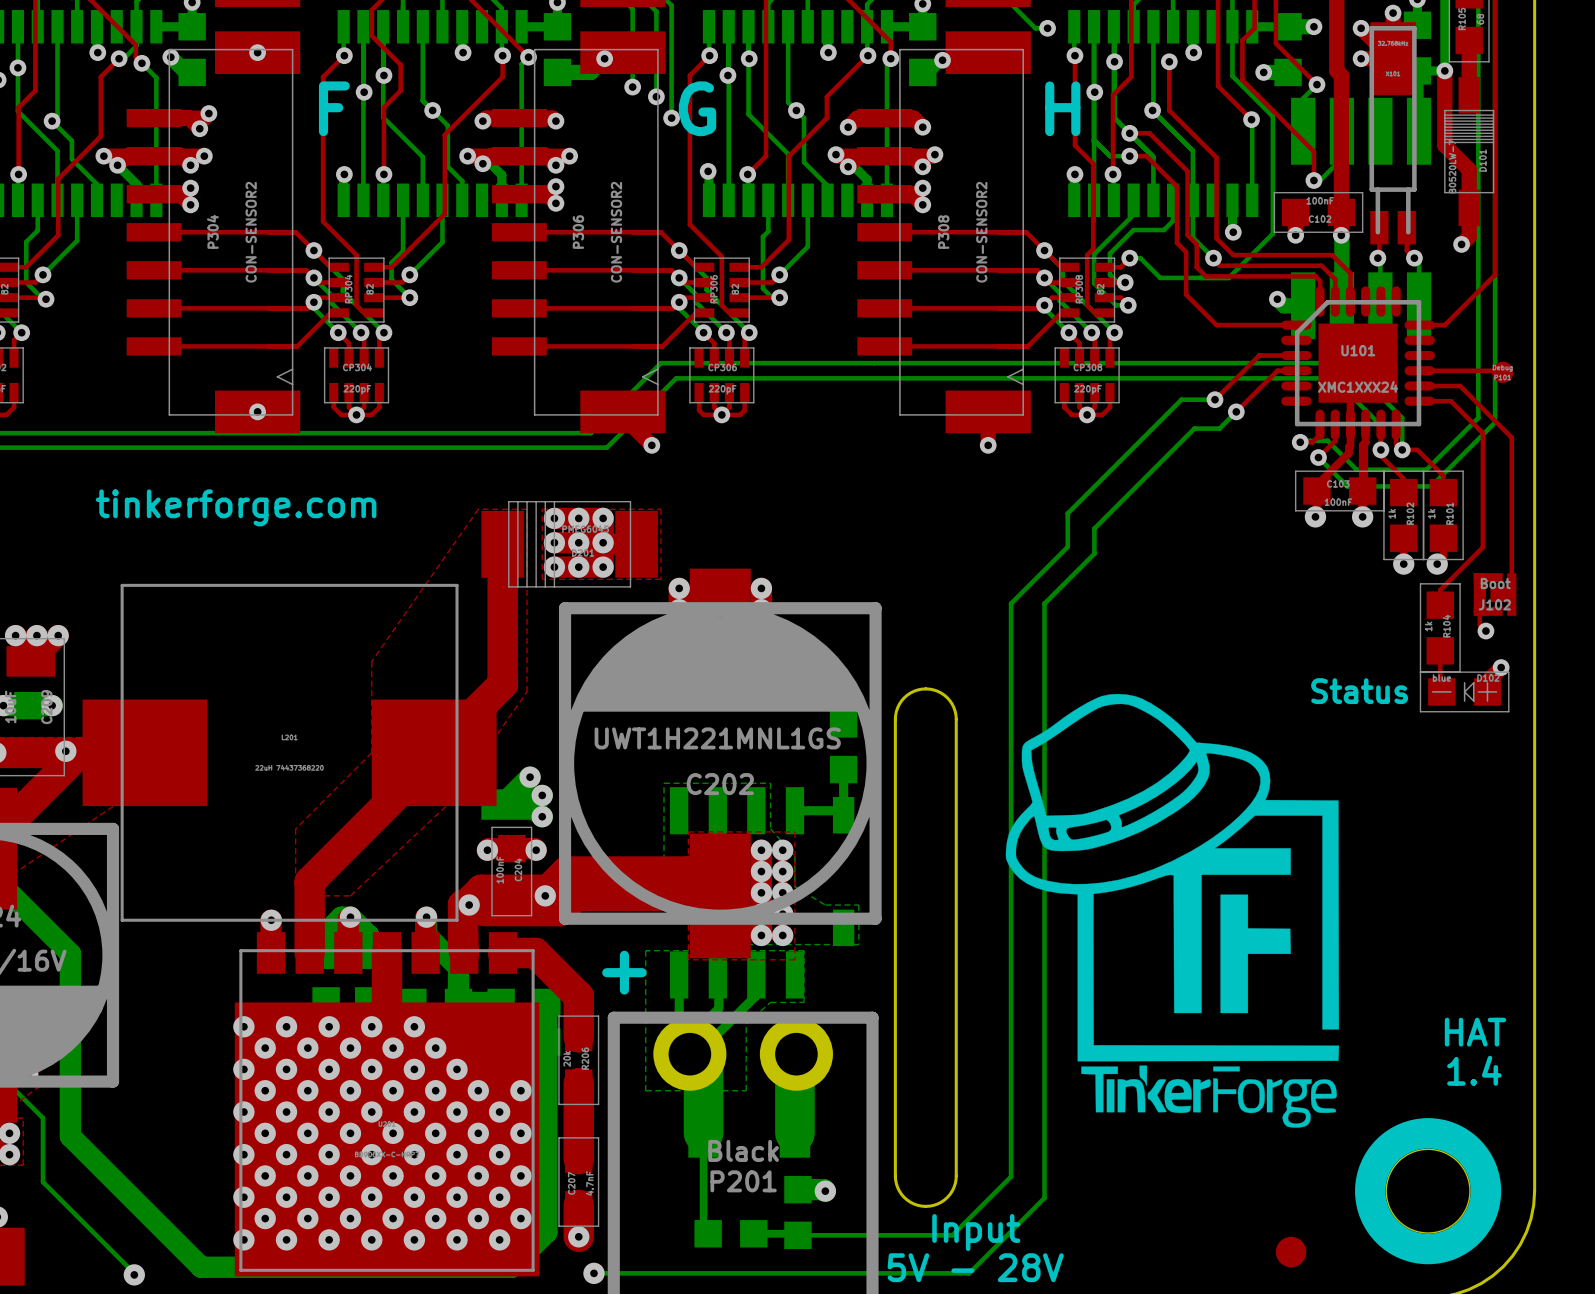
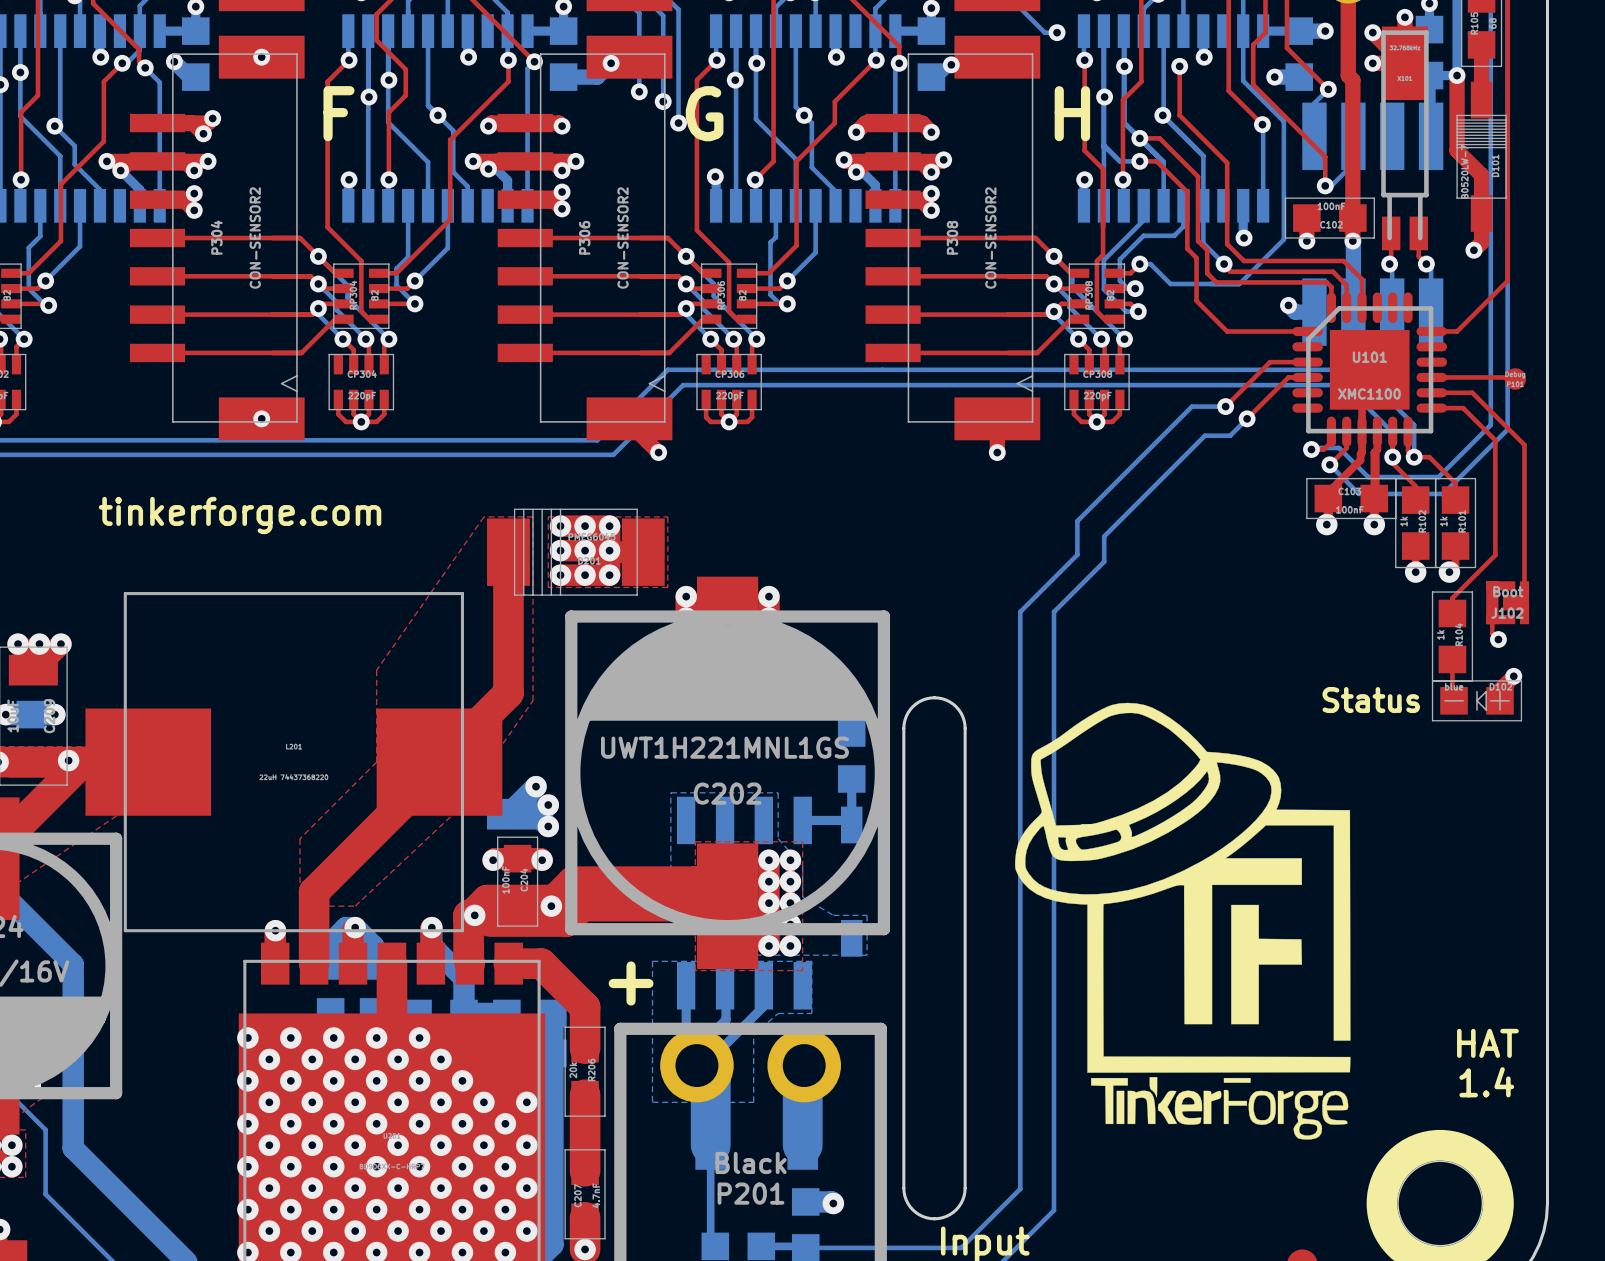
U101 value: XMC1XXX24 (1358, 386) -> XMC1100 (1369, 393)

